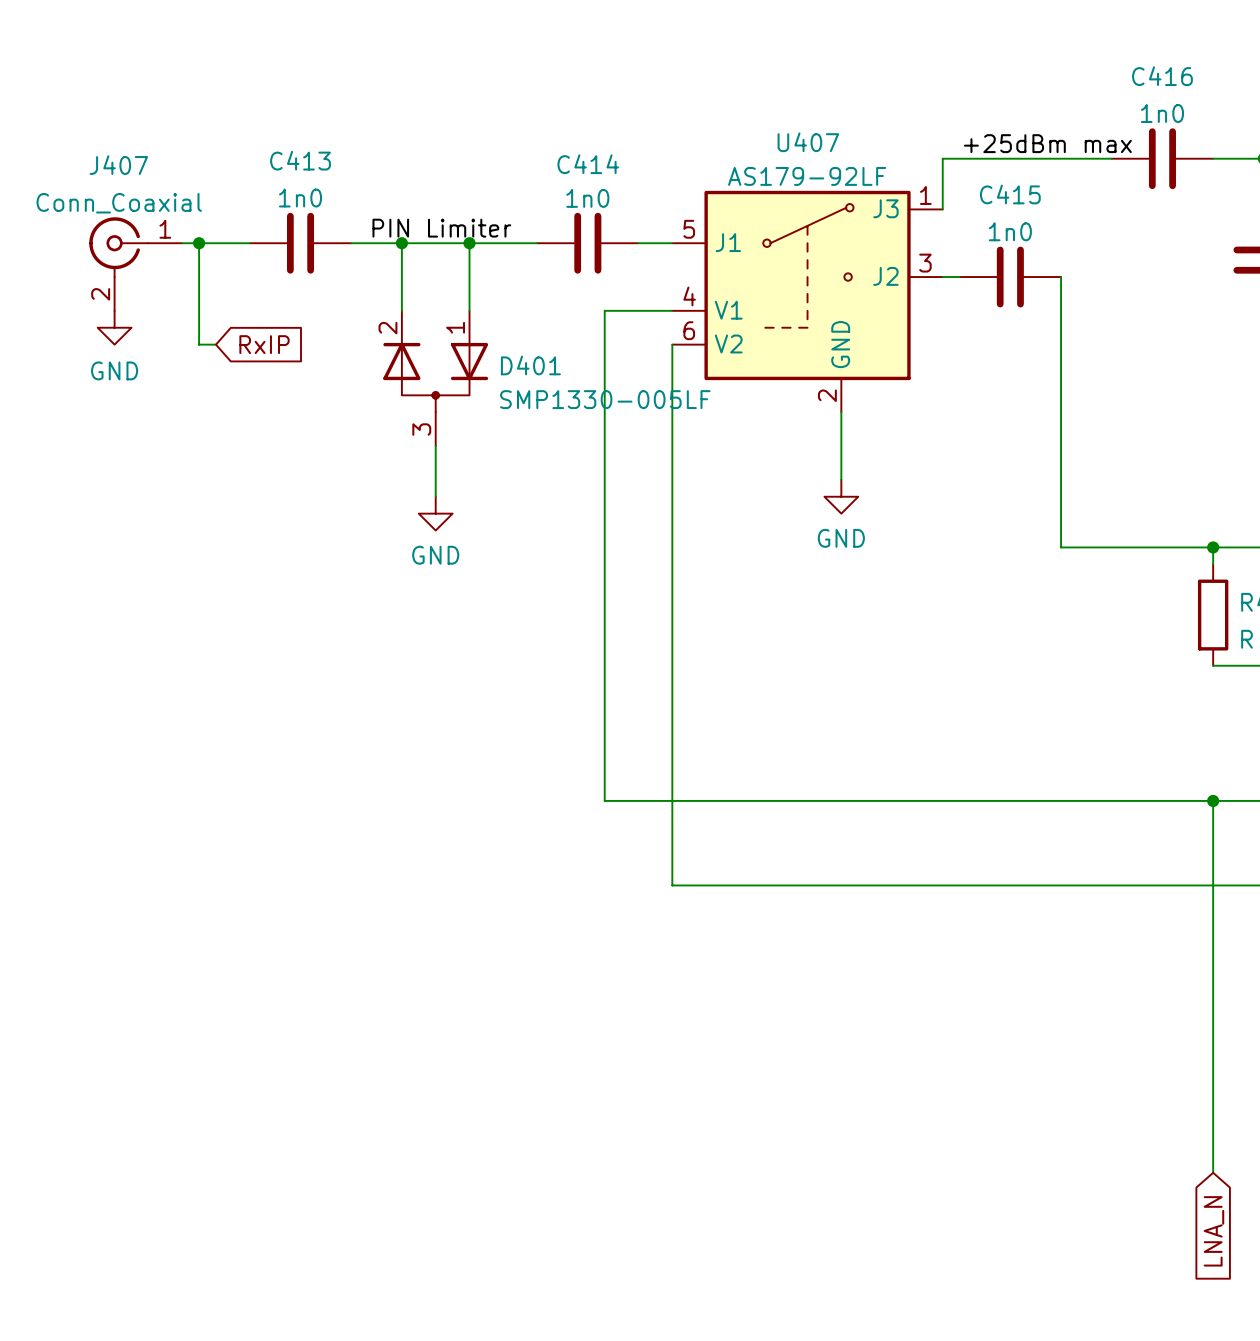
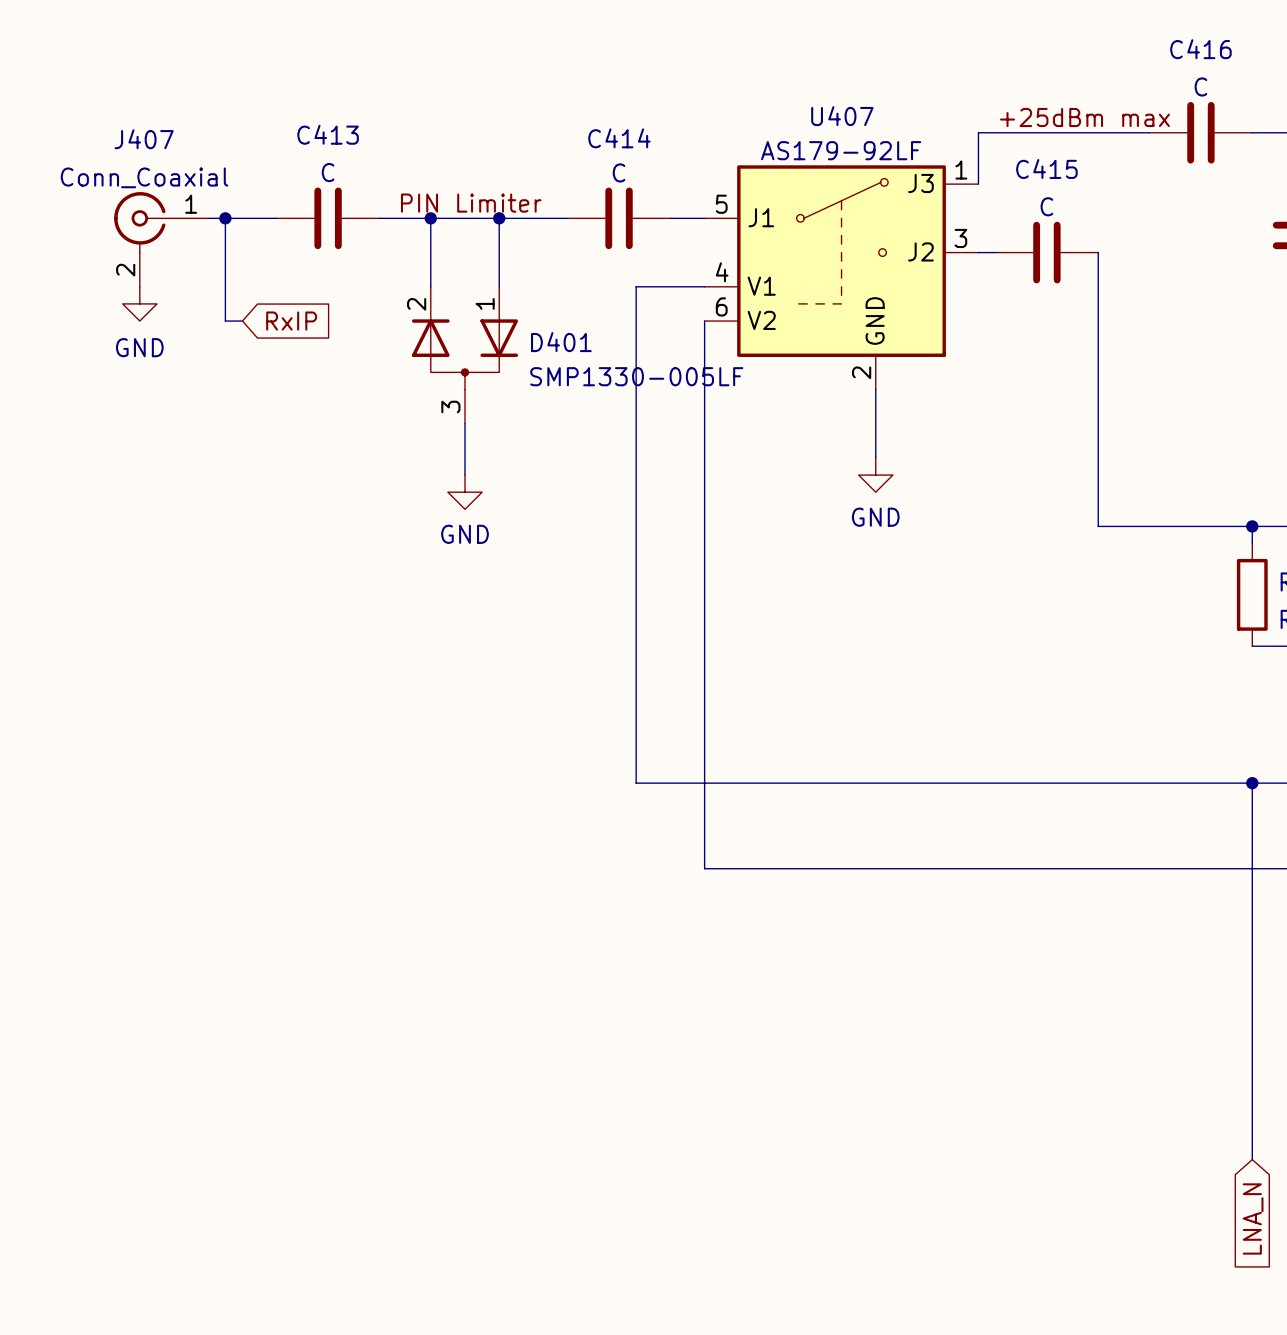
C416 value: 1n0 (1162, 113) -> C (1200, 86)
C413 value: 1n0 (300, 198) -> C (328, 172)
C414 value: 1n0 (587, 198) -> C (619, 172)
C415 value: 1n0 (1010, 231) -> C (1046, 206)

